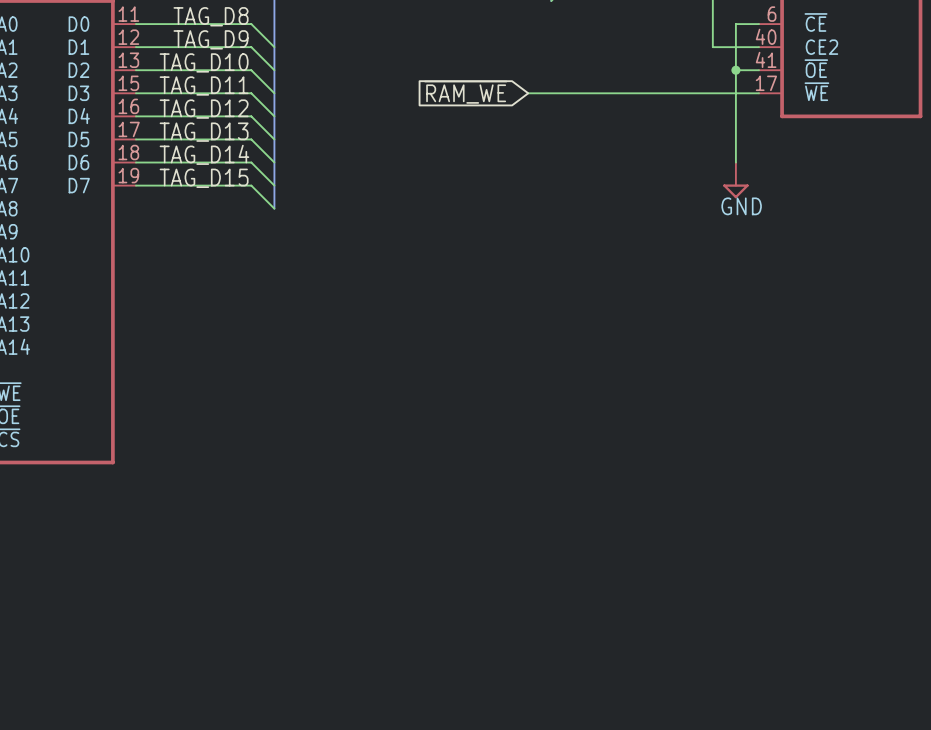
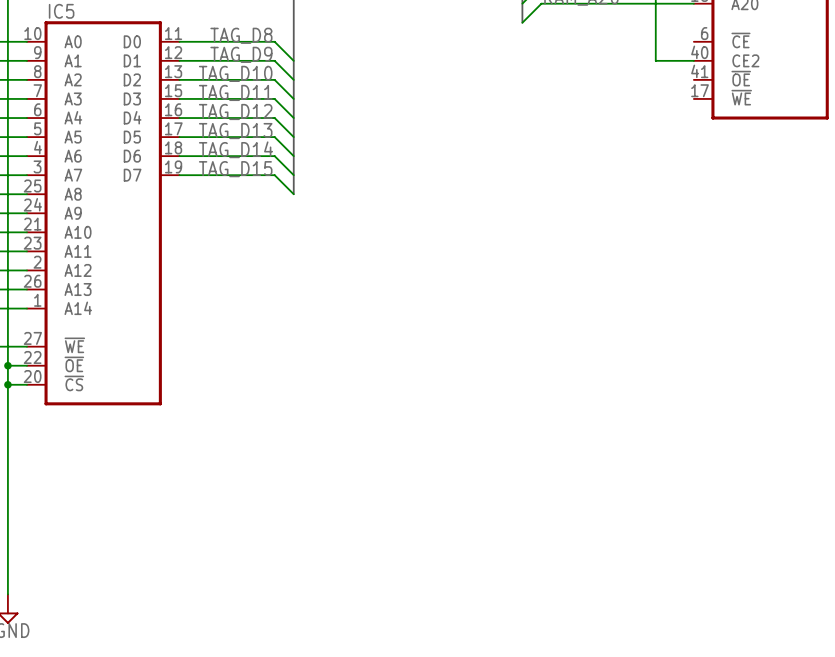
wire: (758, 24) (735, 24) (735, 162) -> none
wire: (735, 70) (758, 70) -> none
junction: (735, 70) -> none
global label: ~{RAM_WE} (465, 92) -> none
wire: (528, 93) (758, 93) -> none
power symbol: GND (735, 180) -> none

